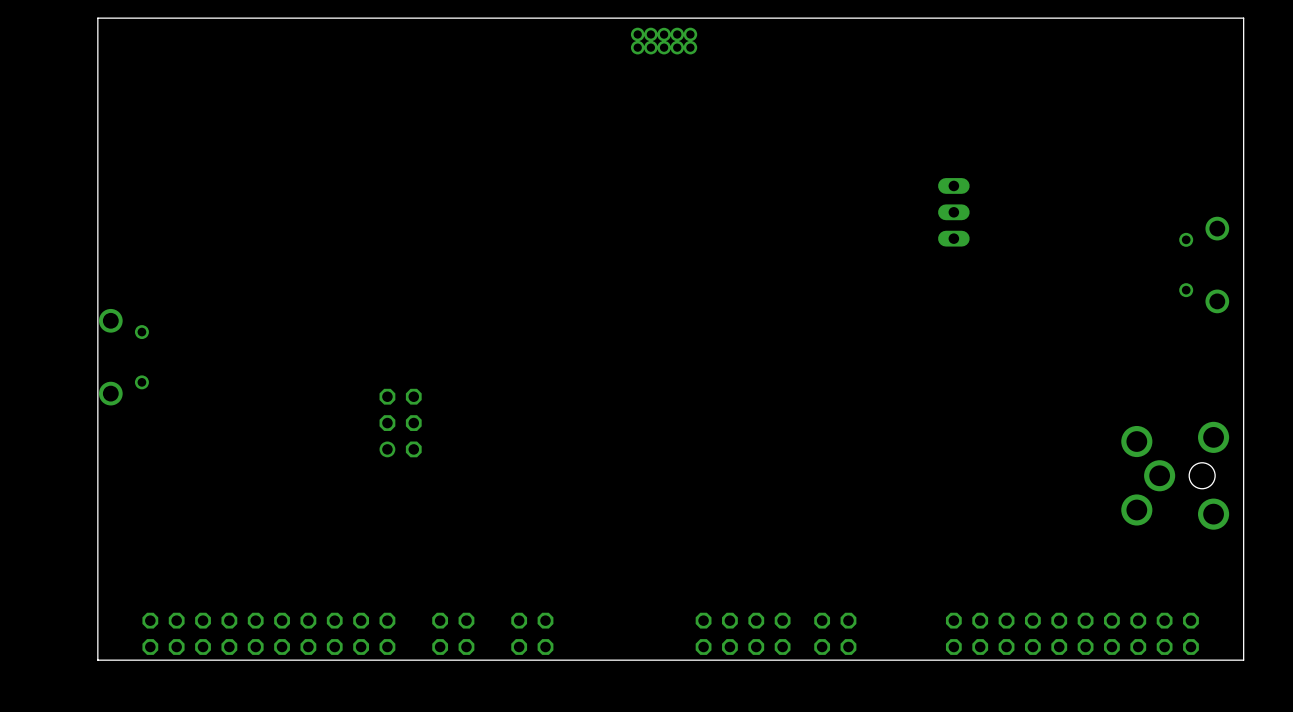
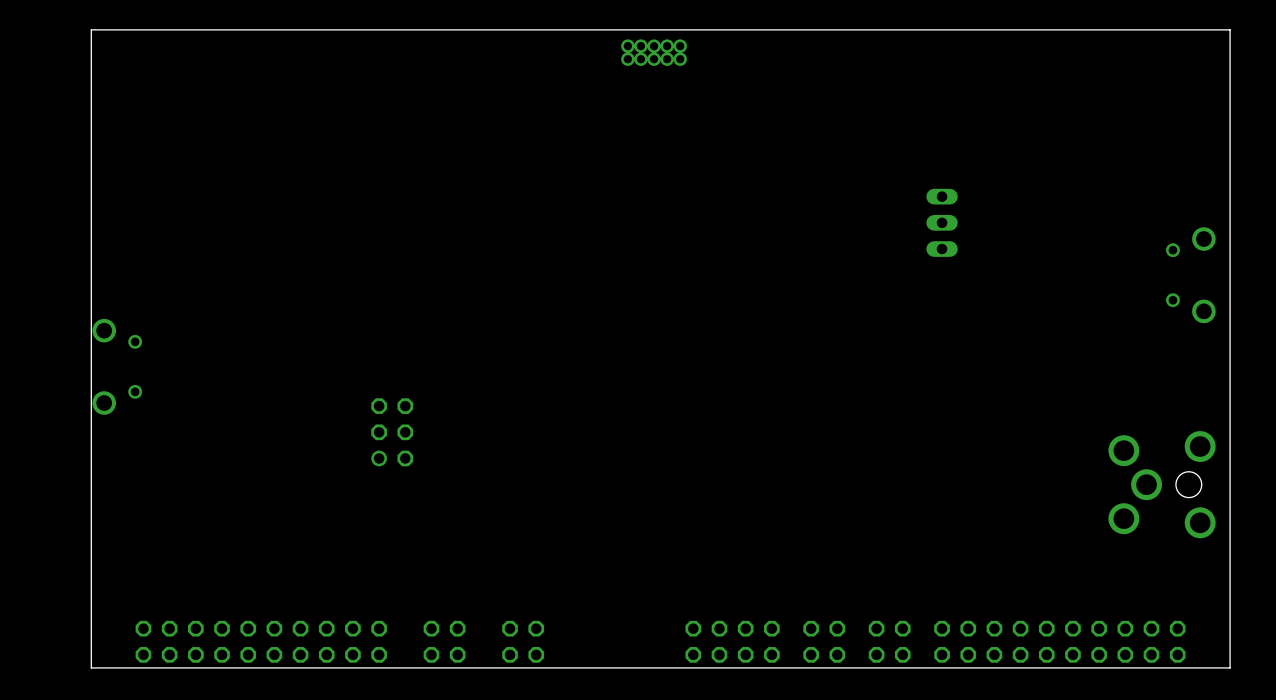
part: none -> (889, 641)

